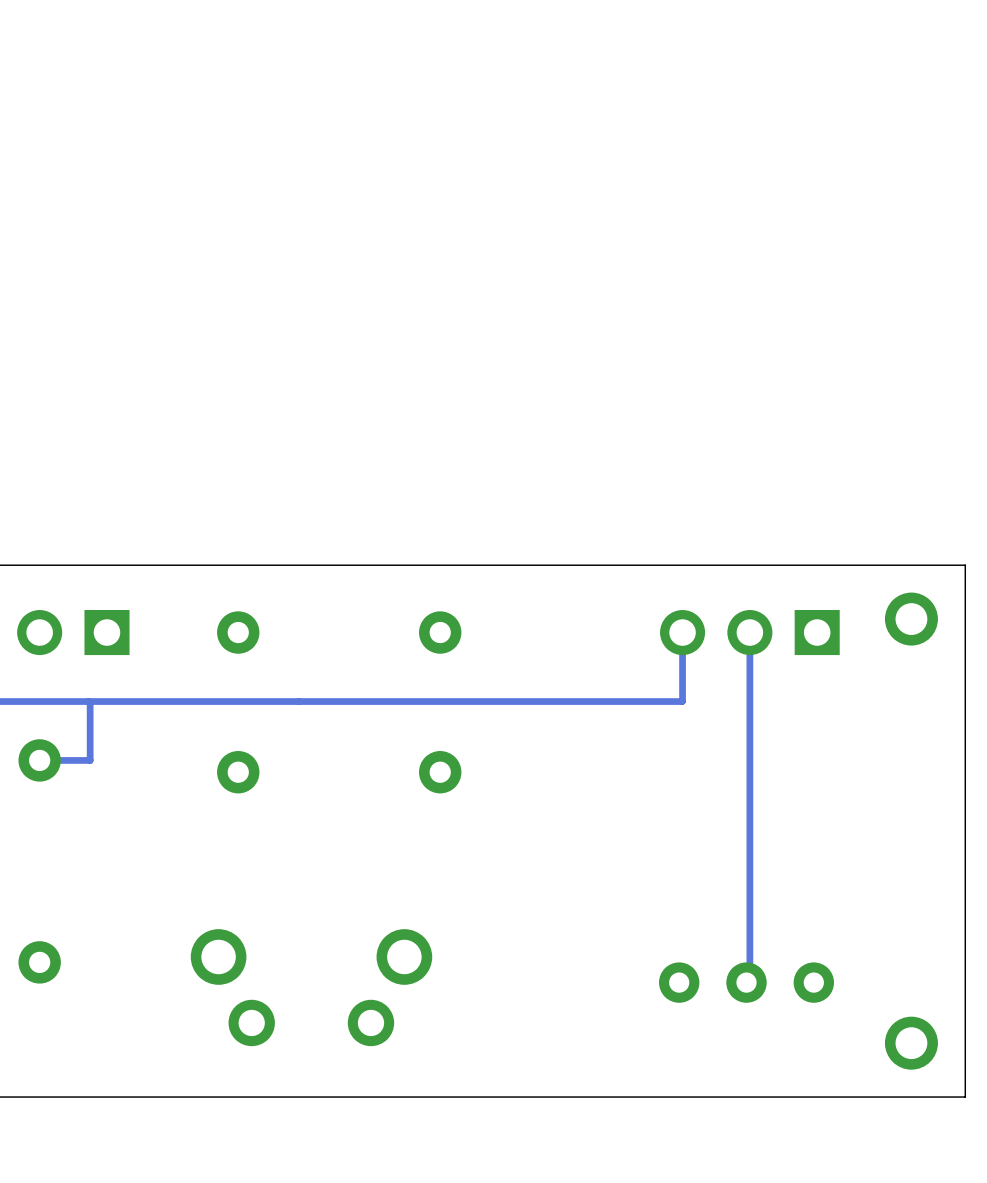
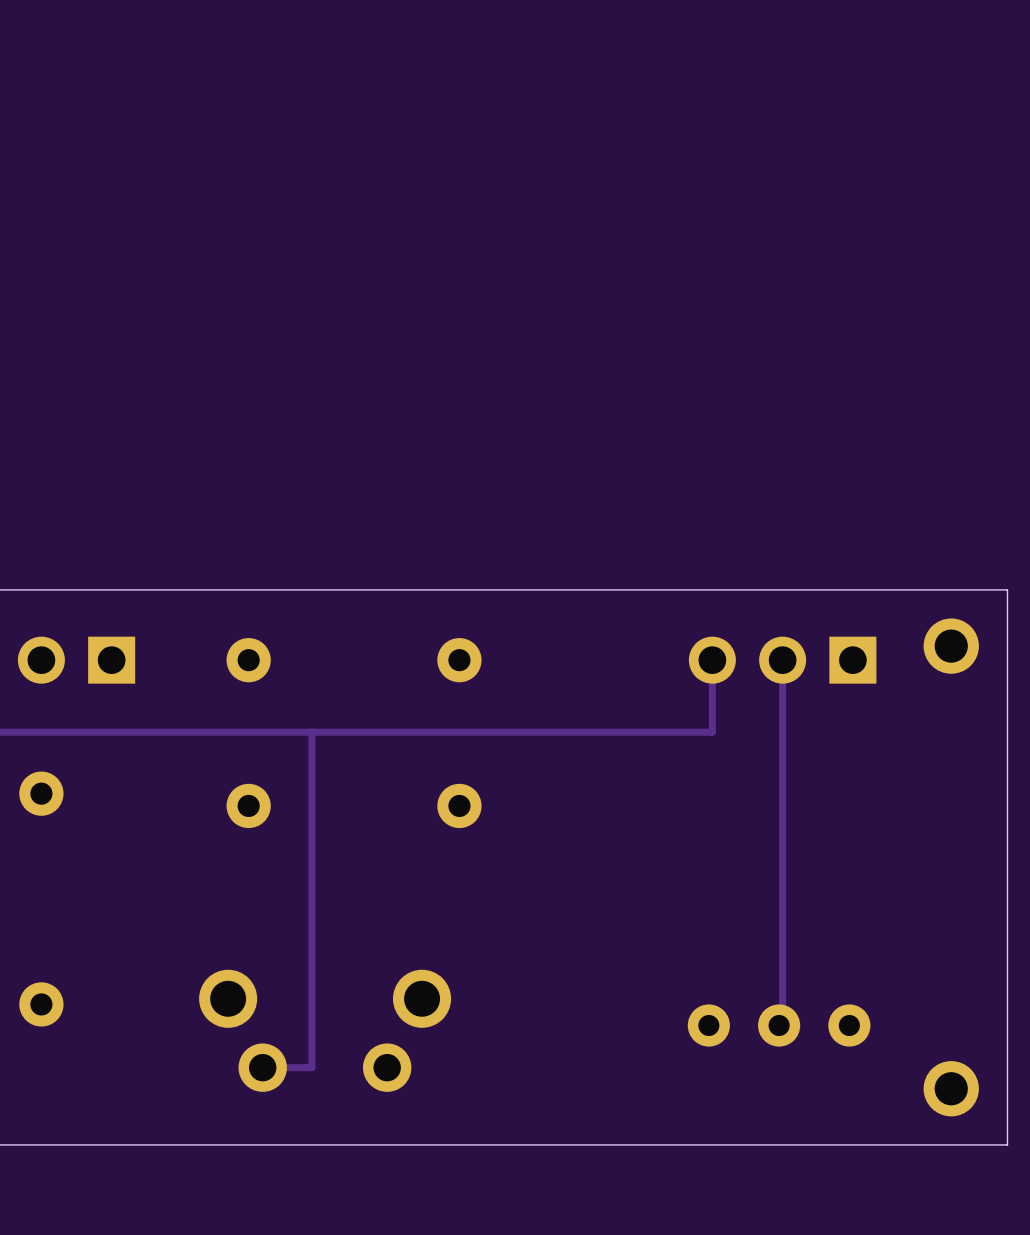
track: (88, 701) (90, 703) (90, 760) (39, 760) -> none
track: none -> (311, 732) (311, 1067) (262, 1067)

